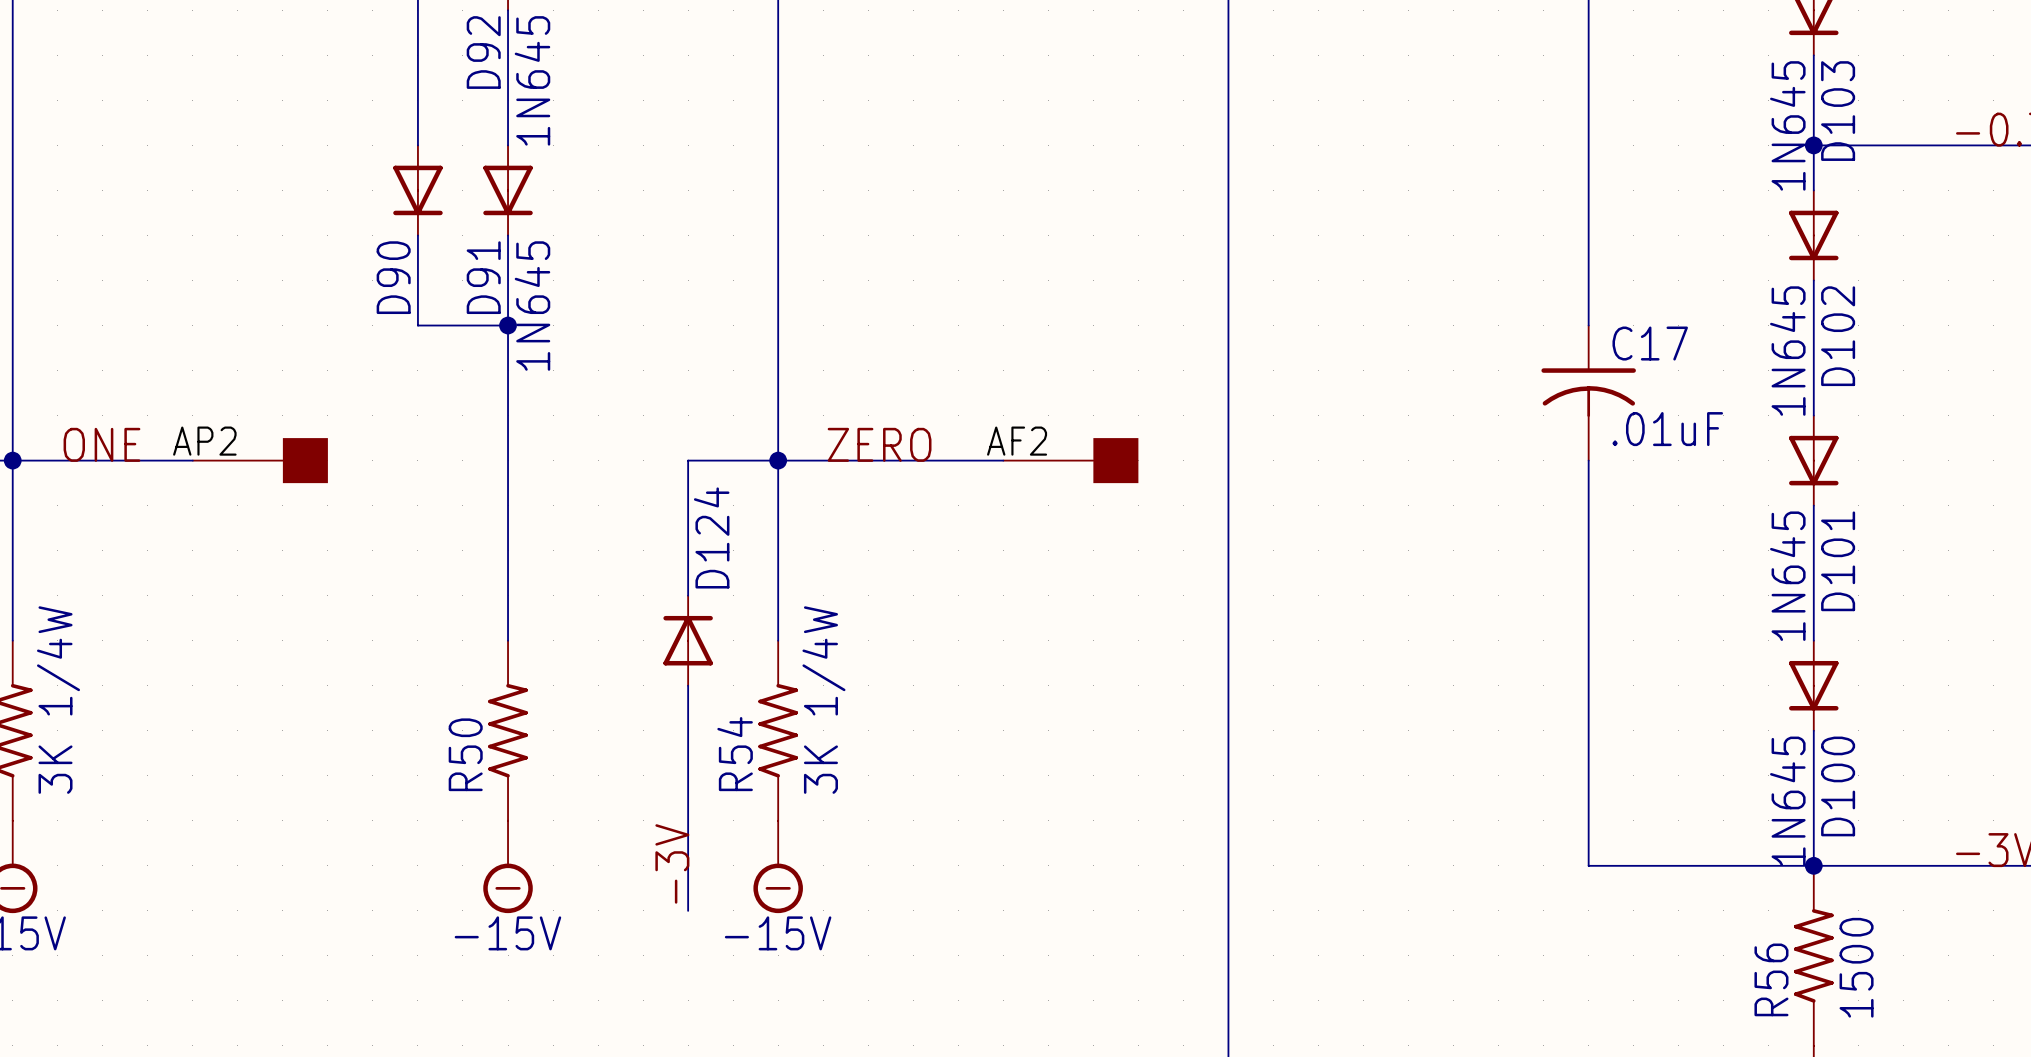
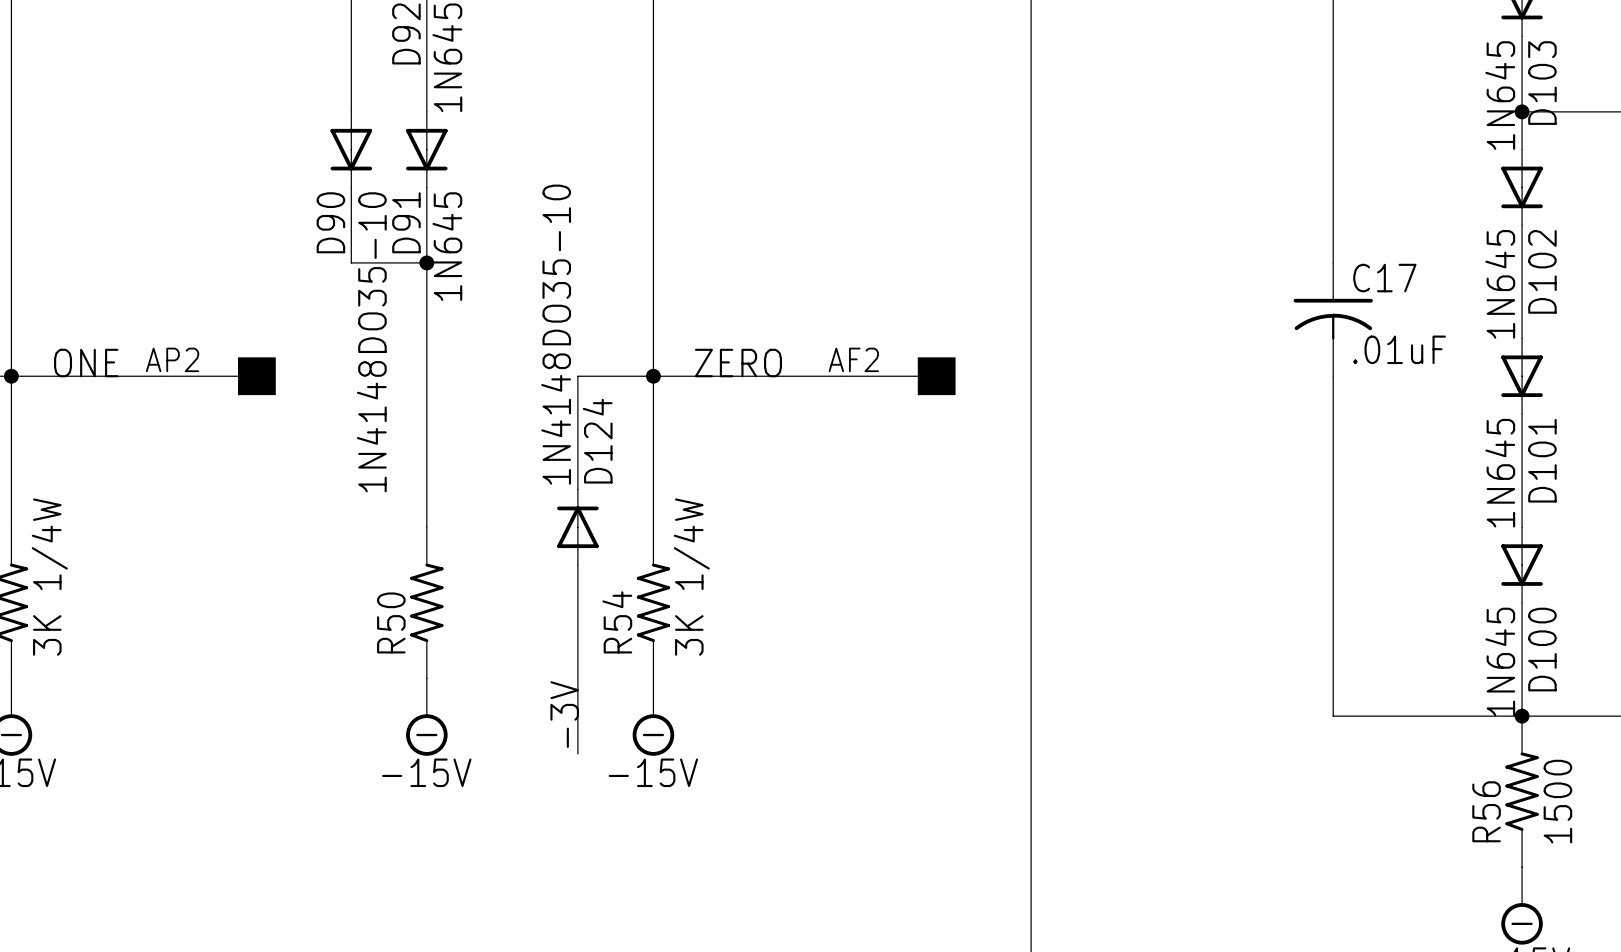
D124 value: none -> 1N4148DO35-10 (556, 334)
D90 value: none -> 1N4148DO35-10 (371, 342)

